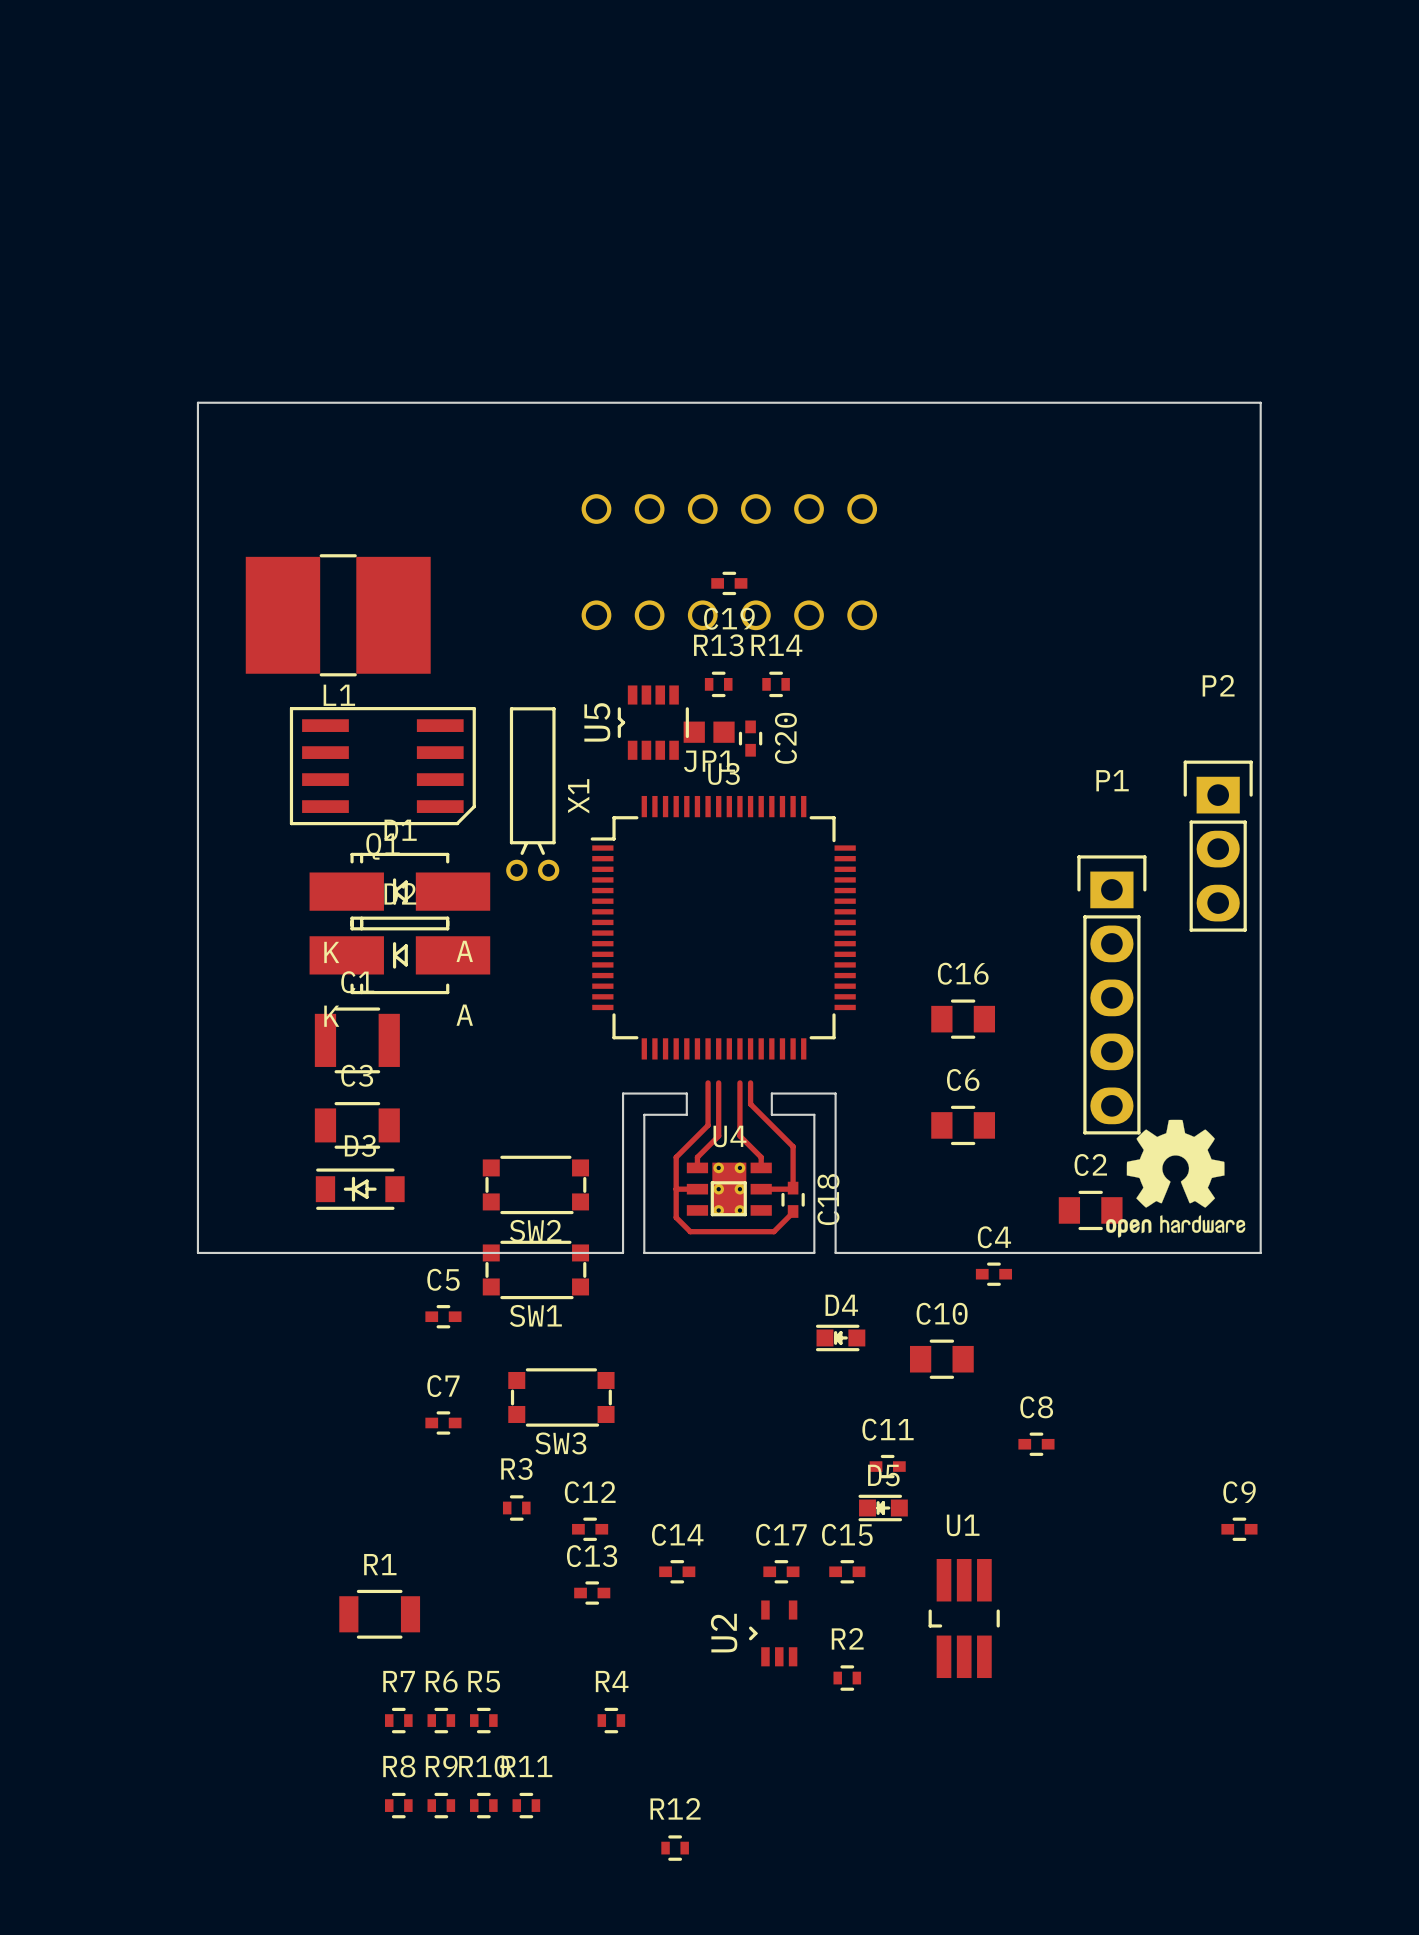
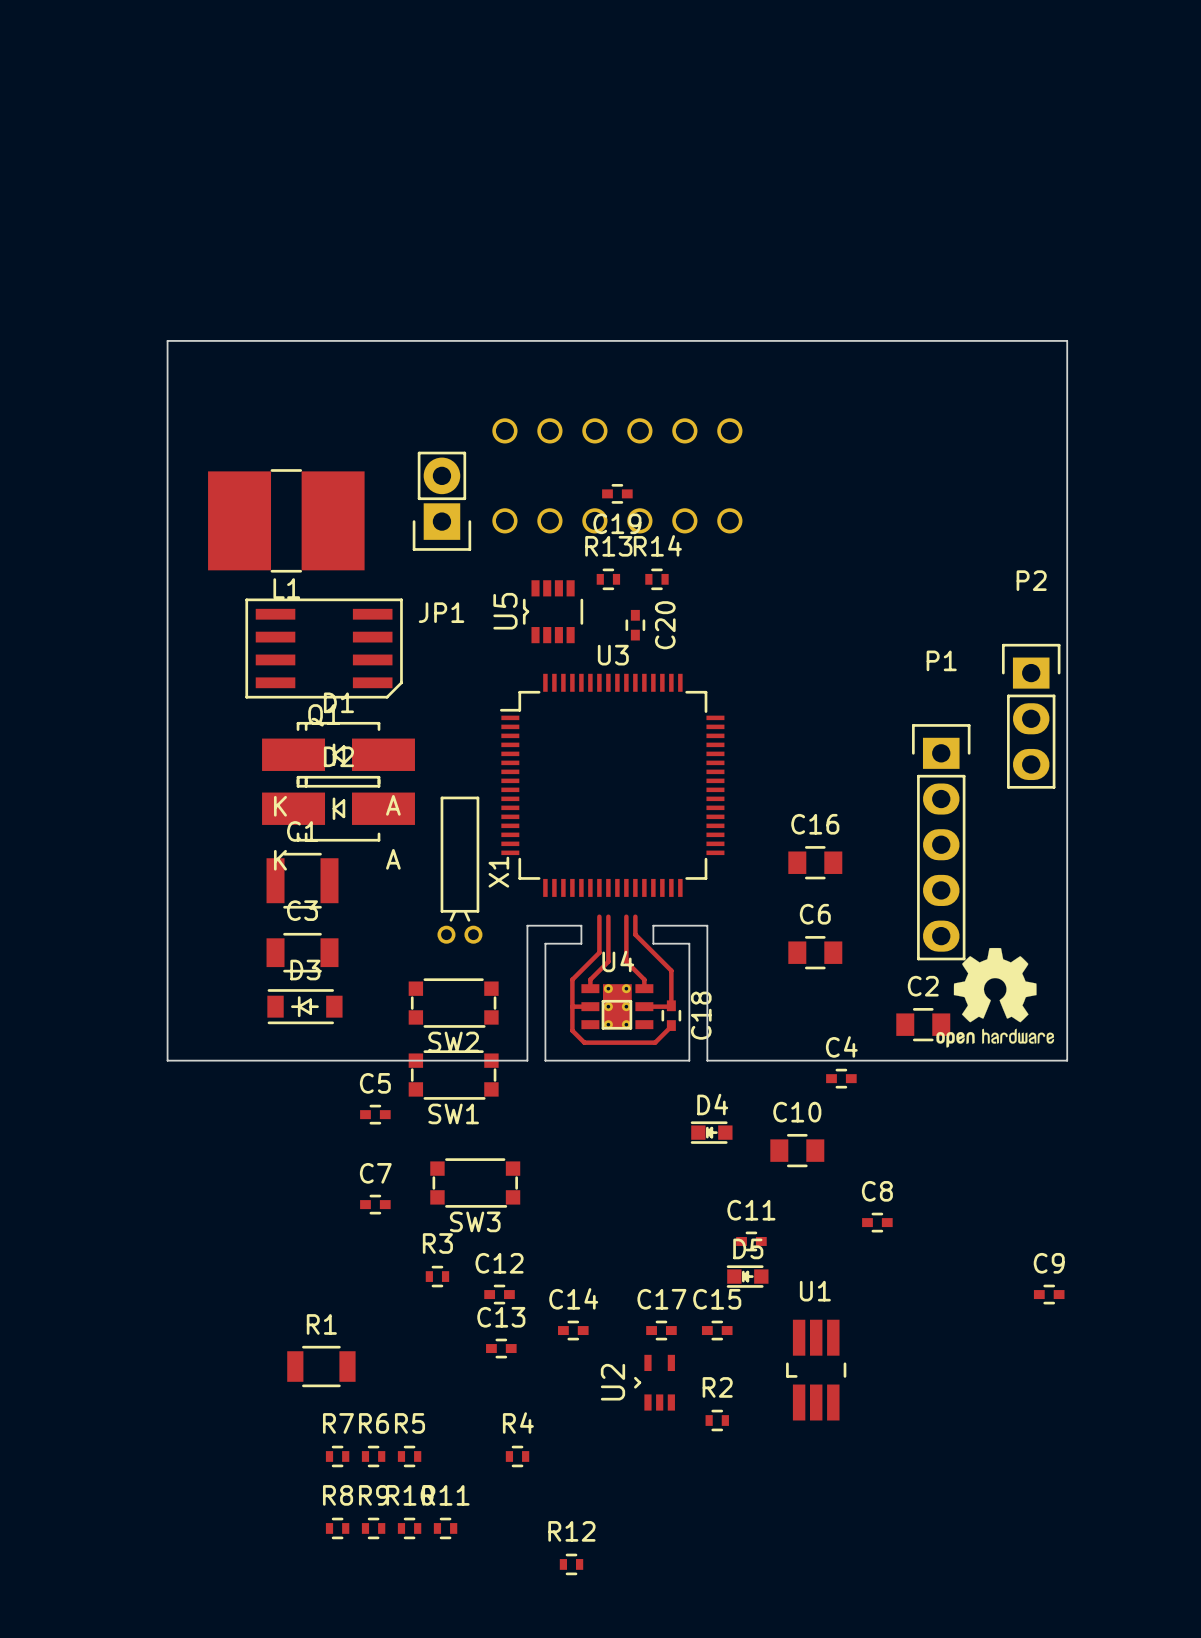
JP1 footprint: [683, 721, 735, 743] -> [412, 451, 472, 551]
JP1 name position: JP1 (709, 761) -> JP1 (441, 612)
X1 position: (532, 794) -> (459, 870)

